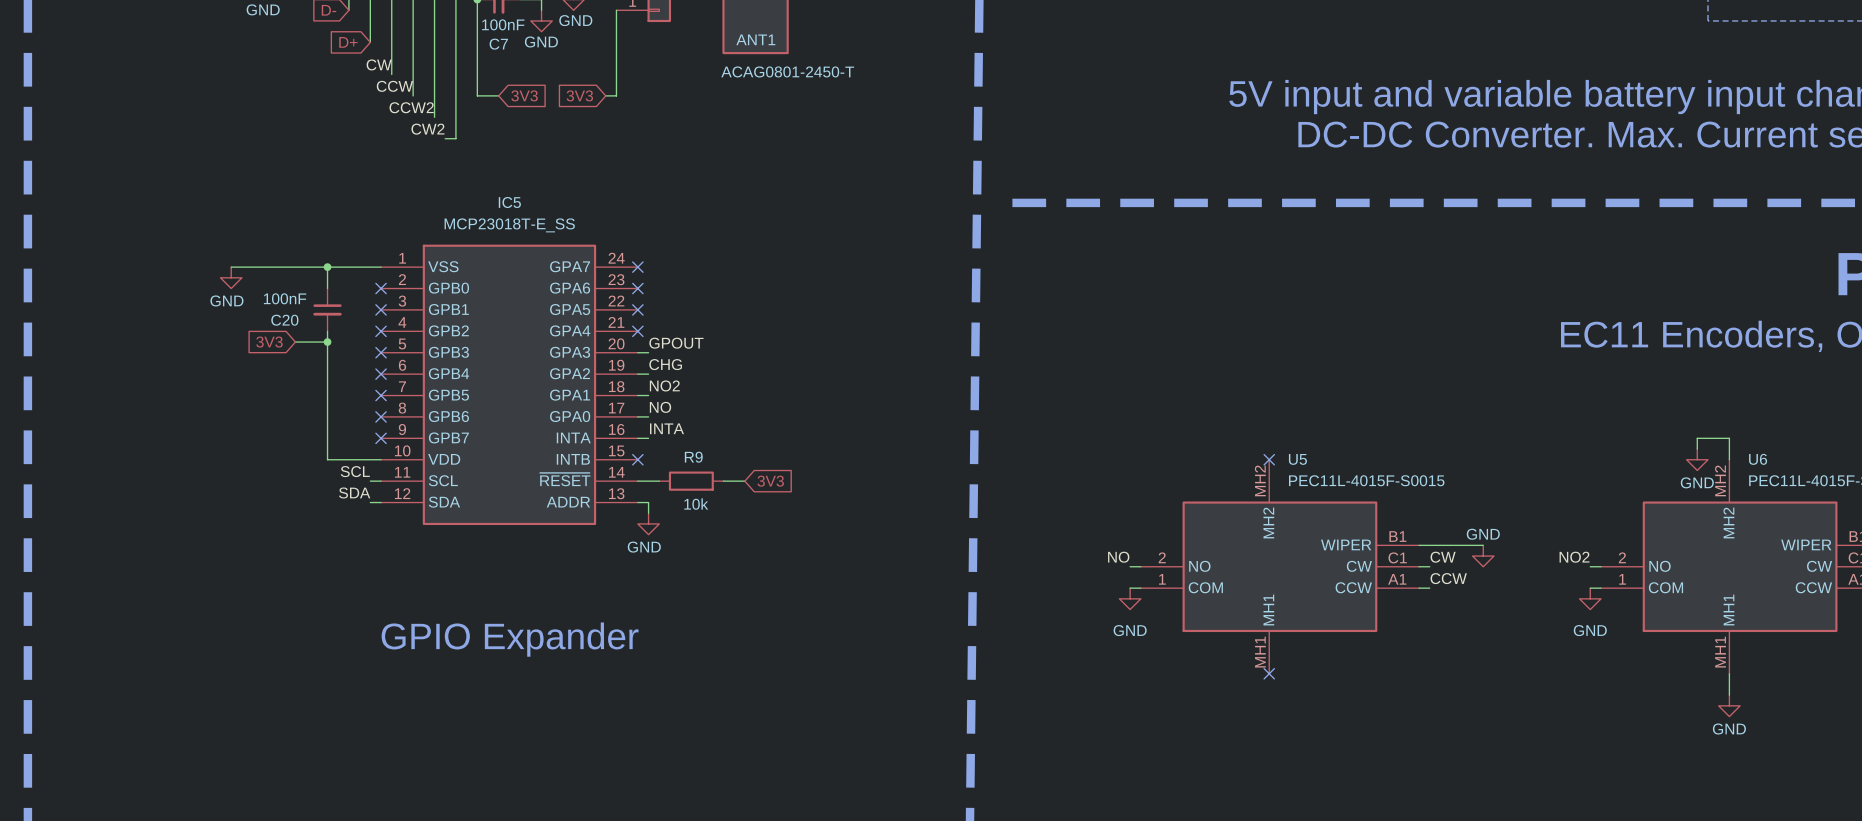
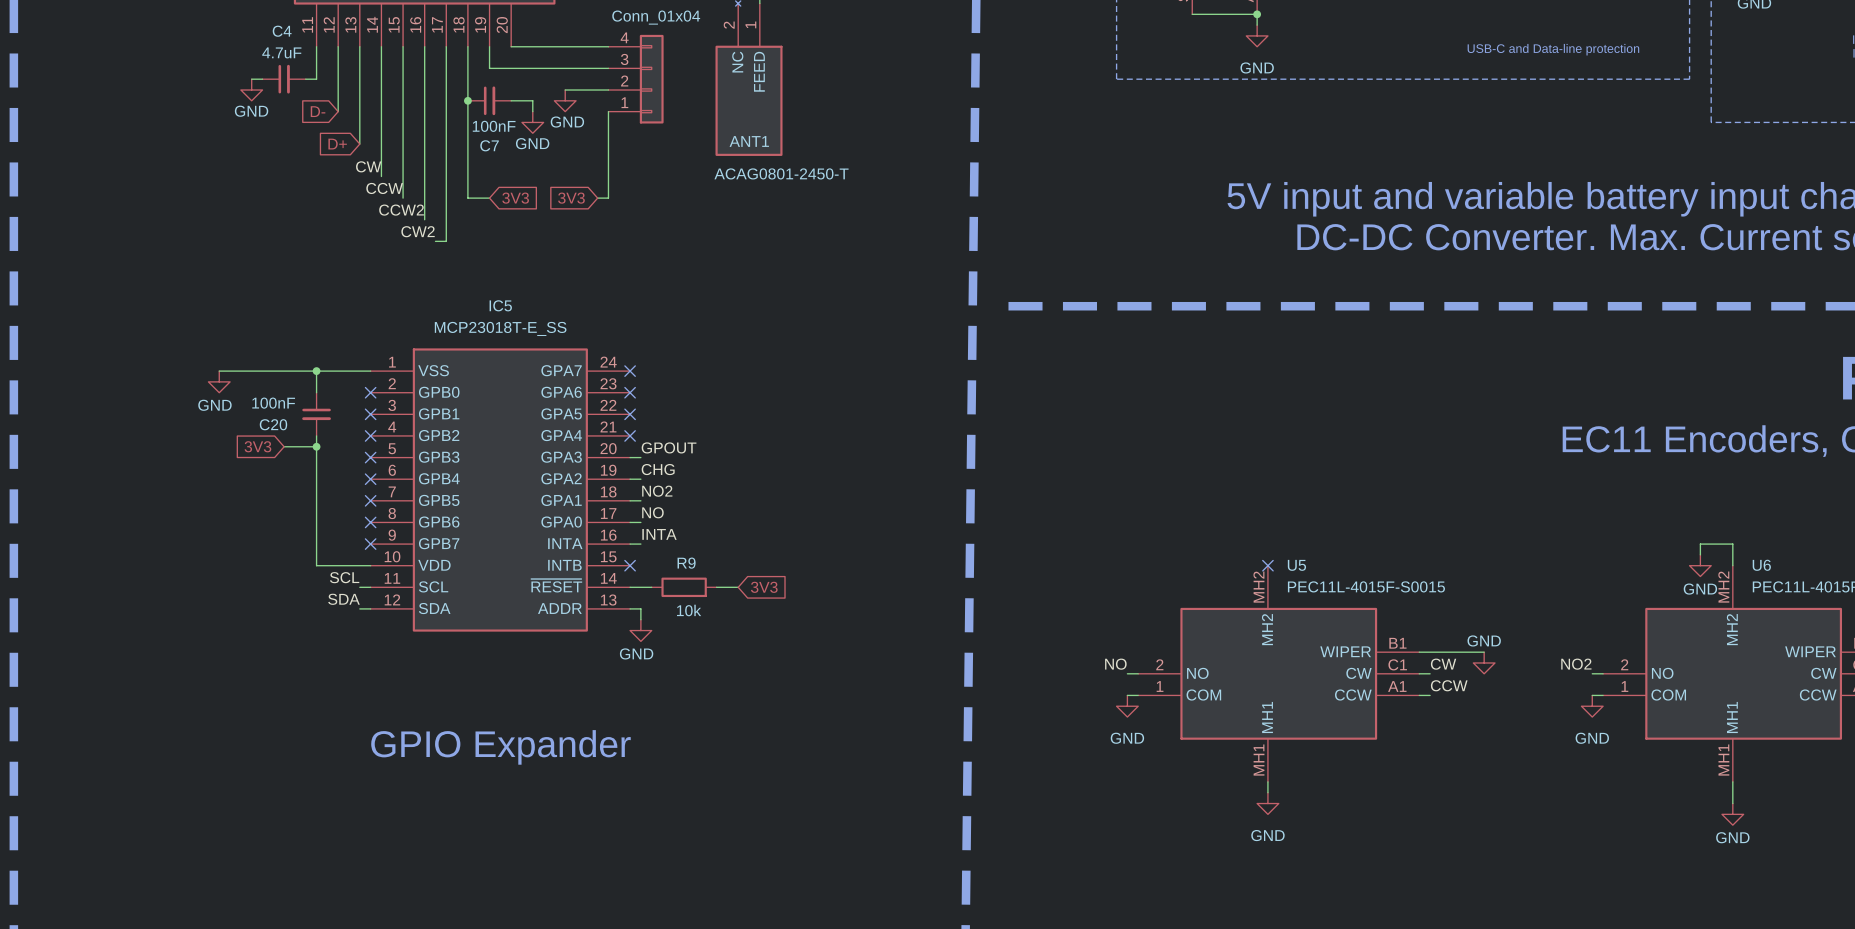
wire: none -> (1267, 781) (1267, 792)
no-connect mark: (1269, 673) -> none
power symbol: none -> GND (1267, 803)

